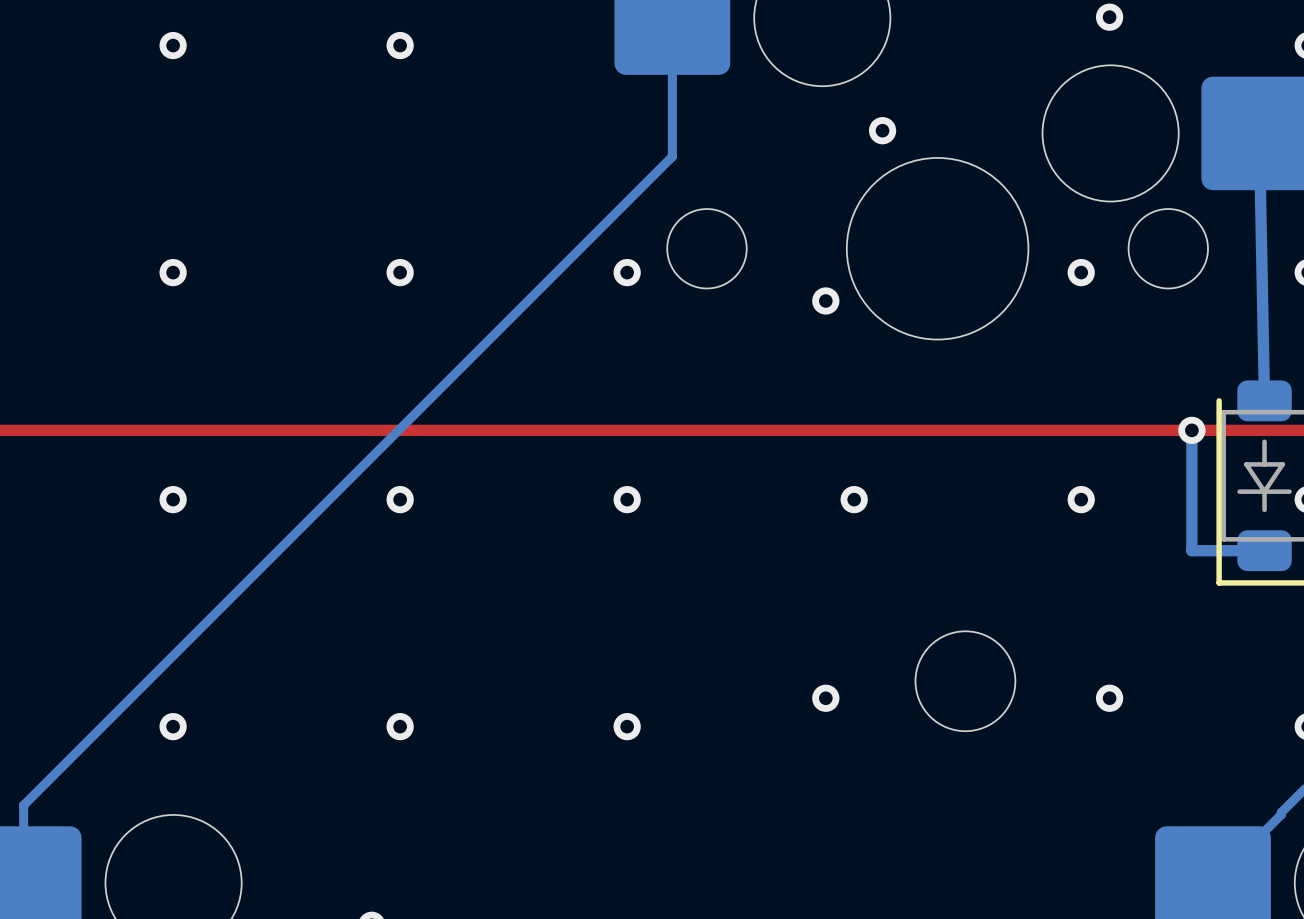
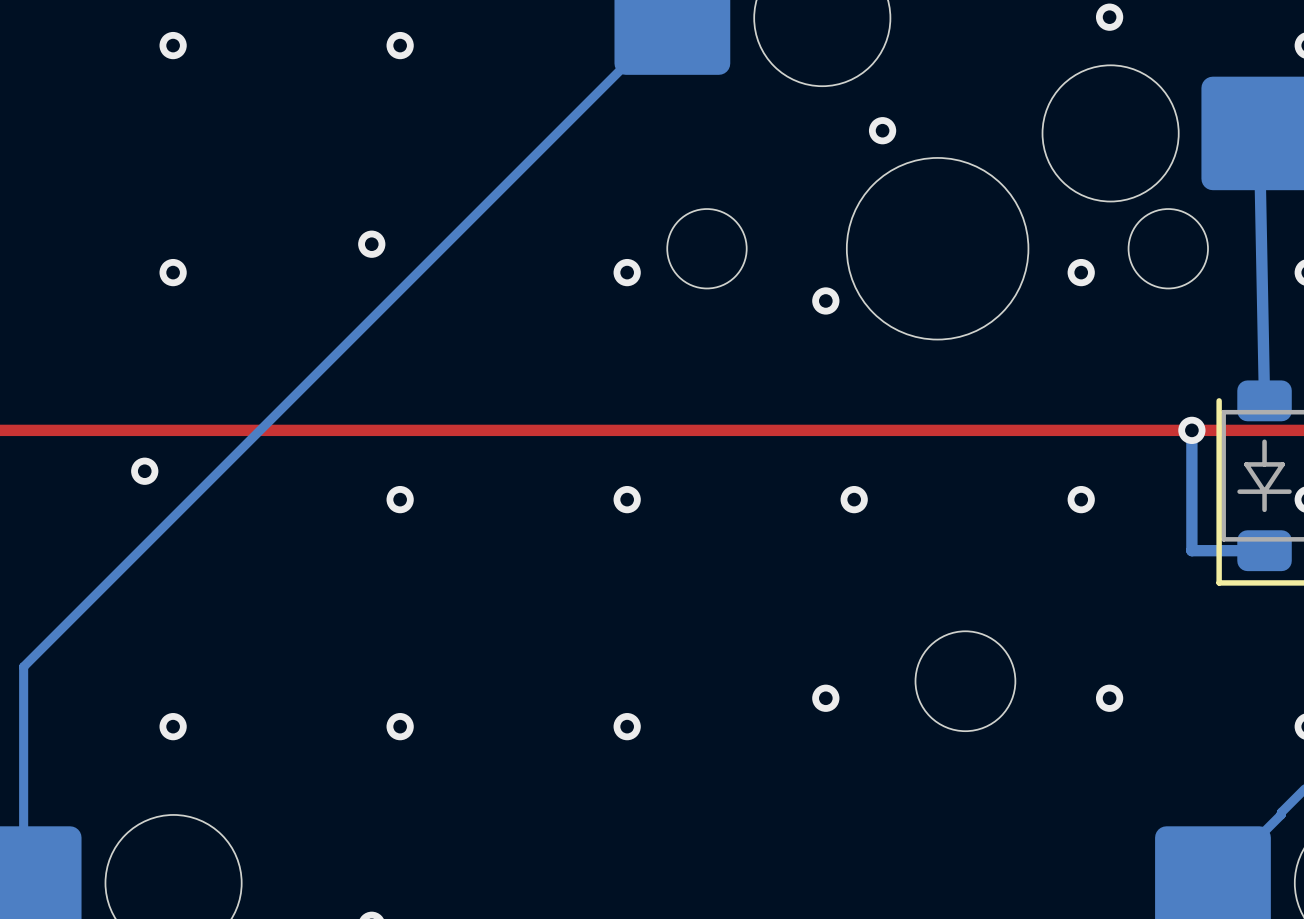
bottom track: (672, 18) (672, 156) (23, 805) -> (672, 18) (23, 666) (23, 805)
via position: (400, 272) -> (371, 244)
via position: (173, 499) -> (144, 471)

